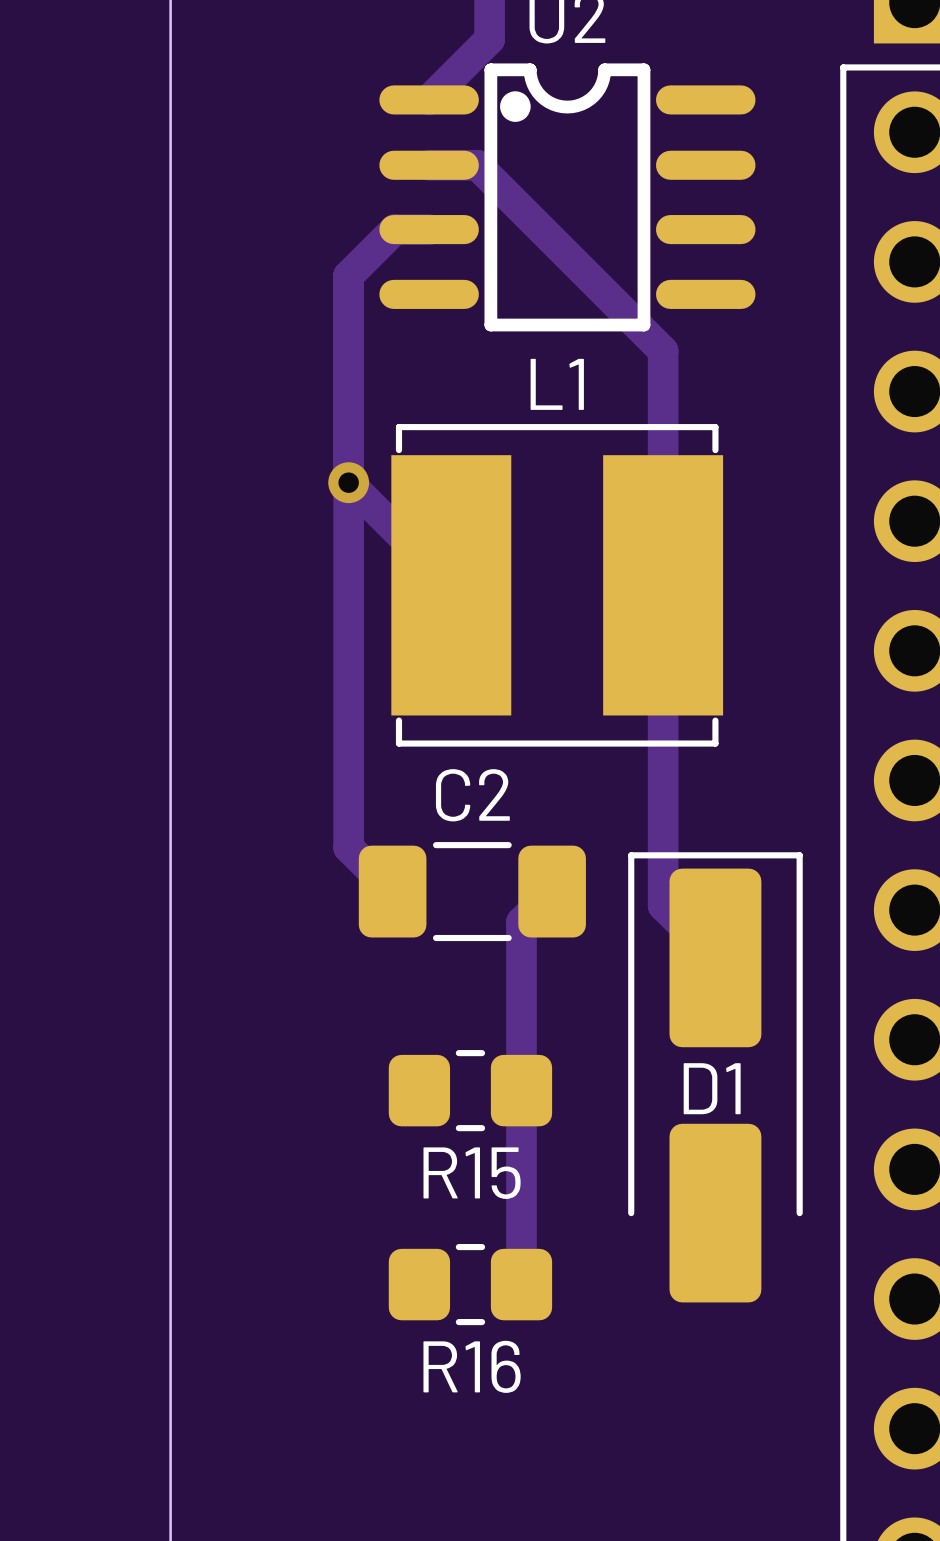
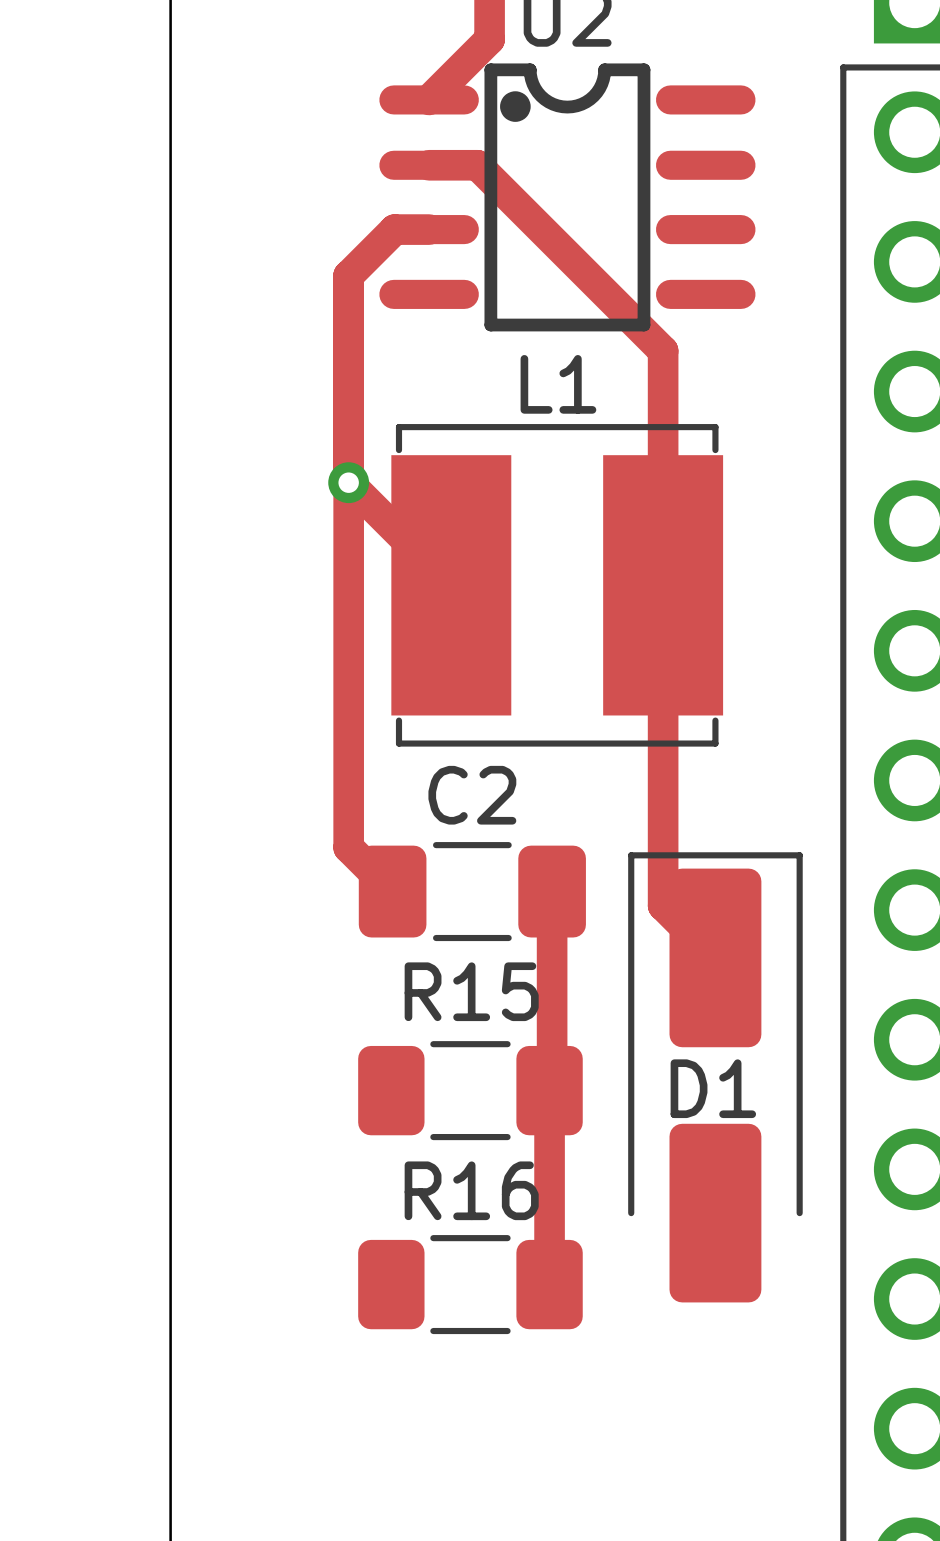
track: (552, 891) (521, 922) (521, 1284) -> (552, 891) (549, 1284)
R15 footprint: [388, 1050, 553, 1132] -> [358, 1041, 583, 1141]
R15 name position: R15 (472, 1173) -> R15 (471, 991)
R16 footprint: [388, 1243, 553, 1326] -> [358, 1235, 583, 1335]
R16 name position: R16 (472, 1366) -> R16 (471, 1190)

